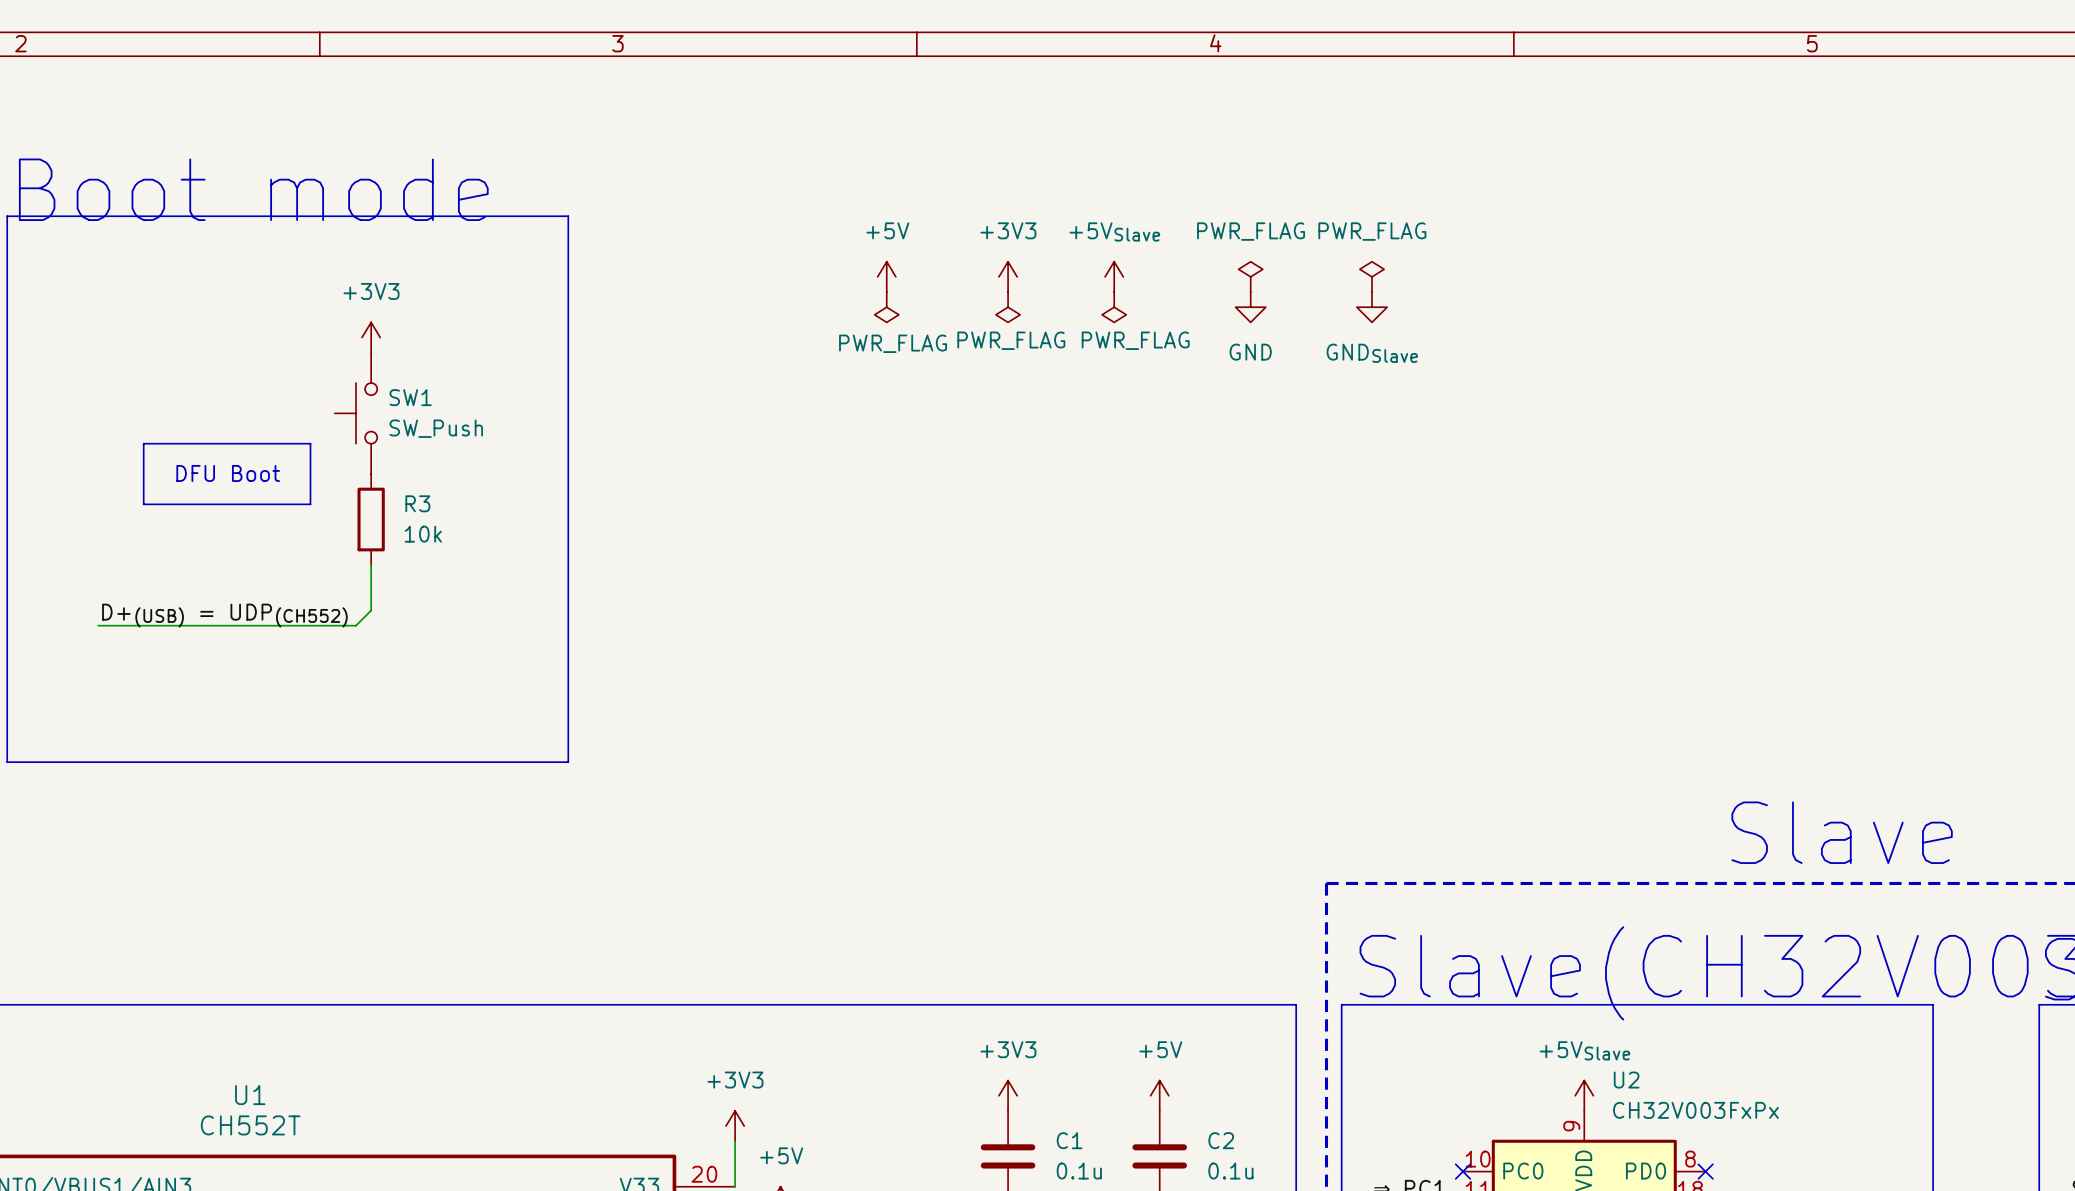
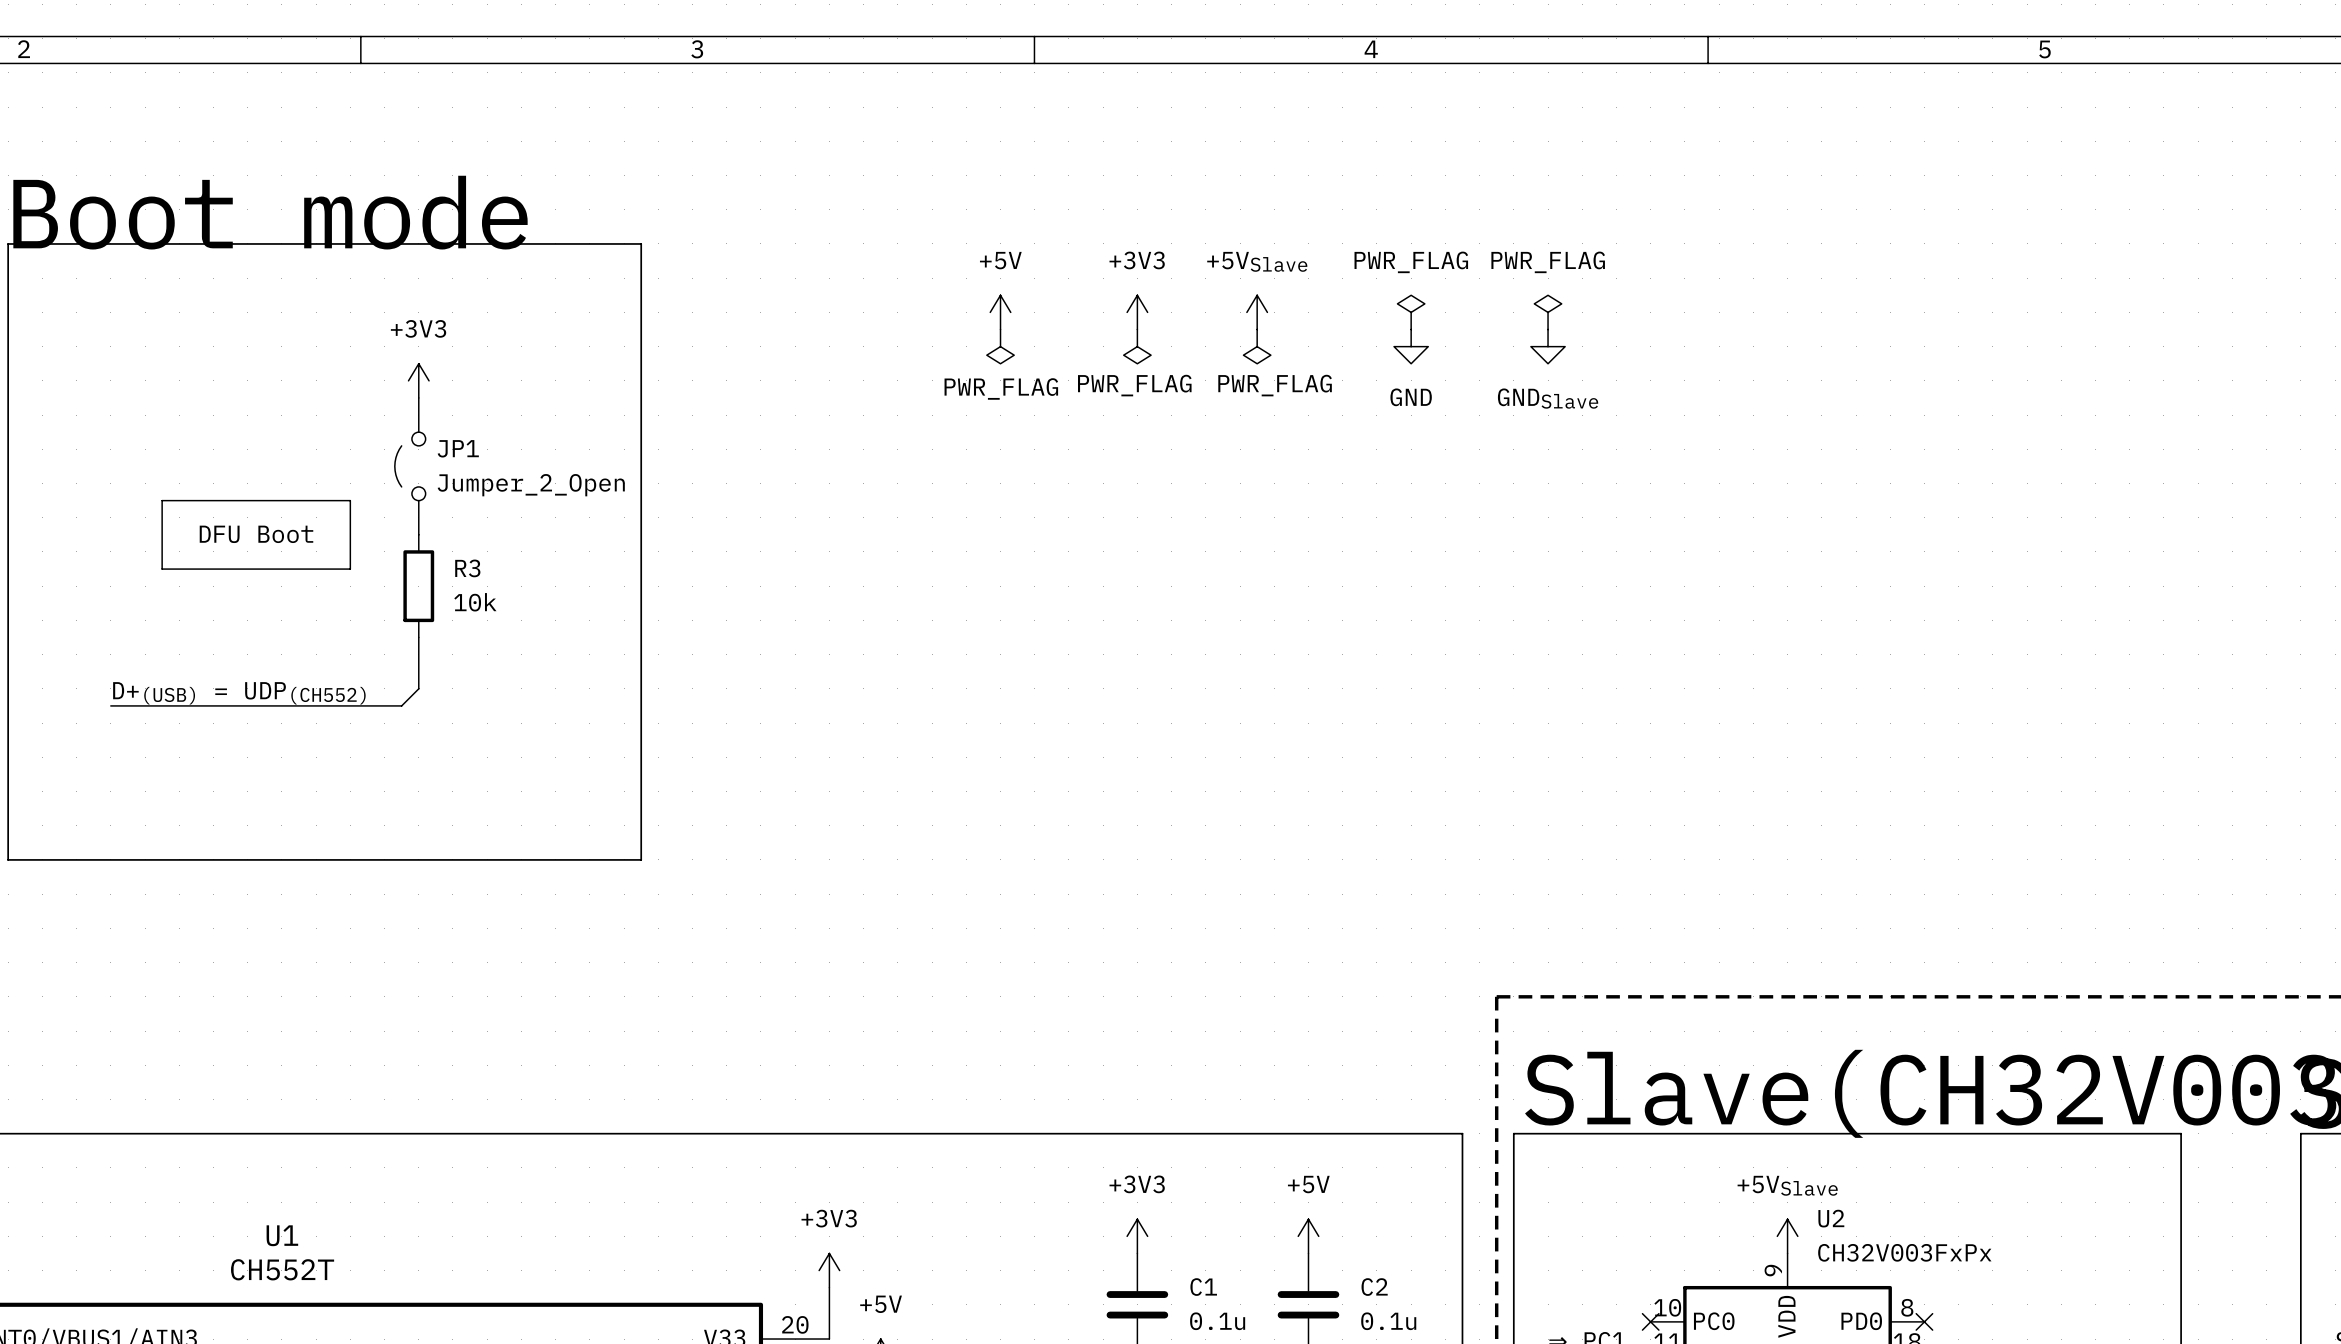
SW1: SW_Push (355, 413) -> none
JP1: none -> Jumper_2_Open (410, 466)
text: Slave (1842, 832) -> none

